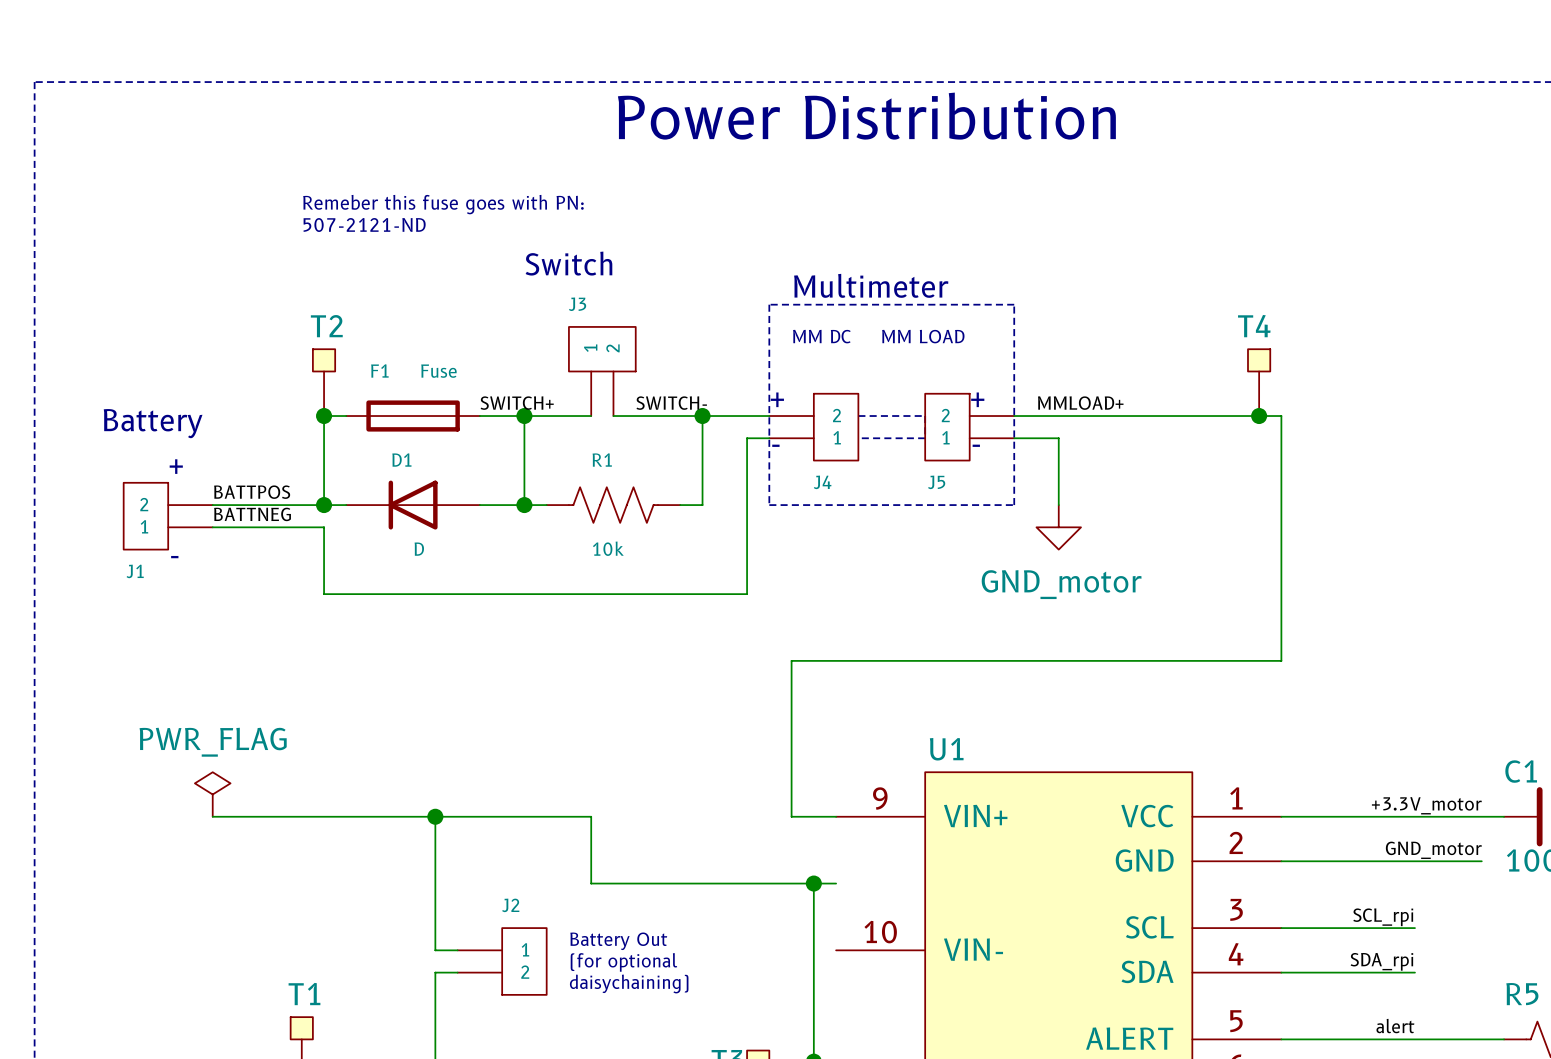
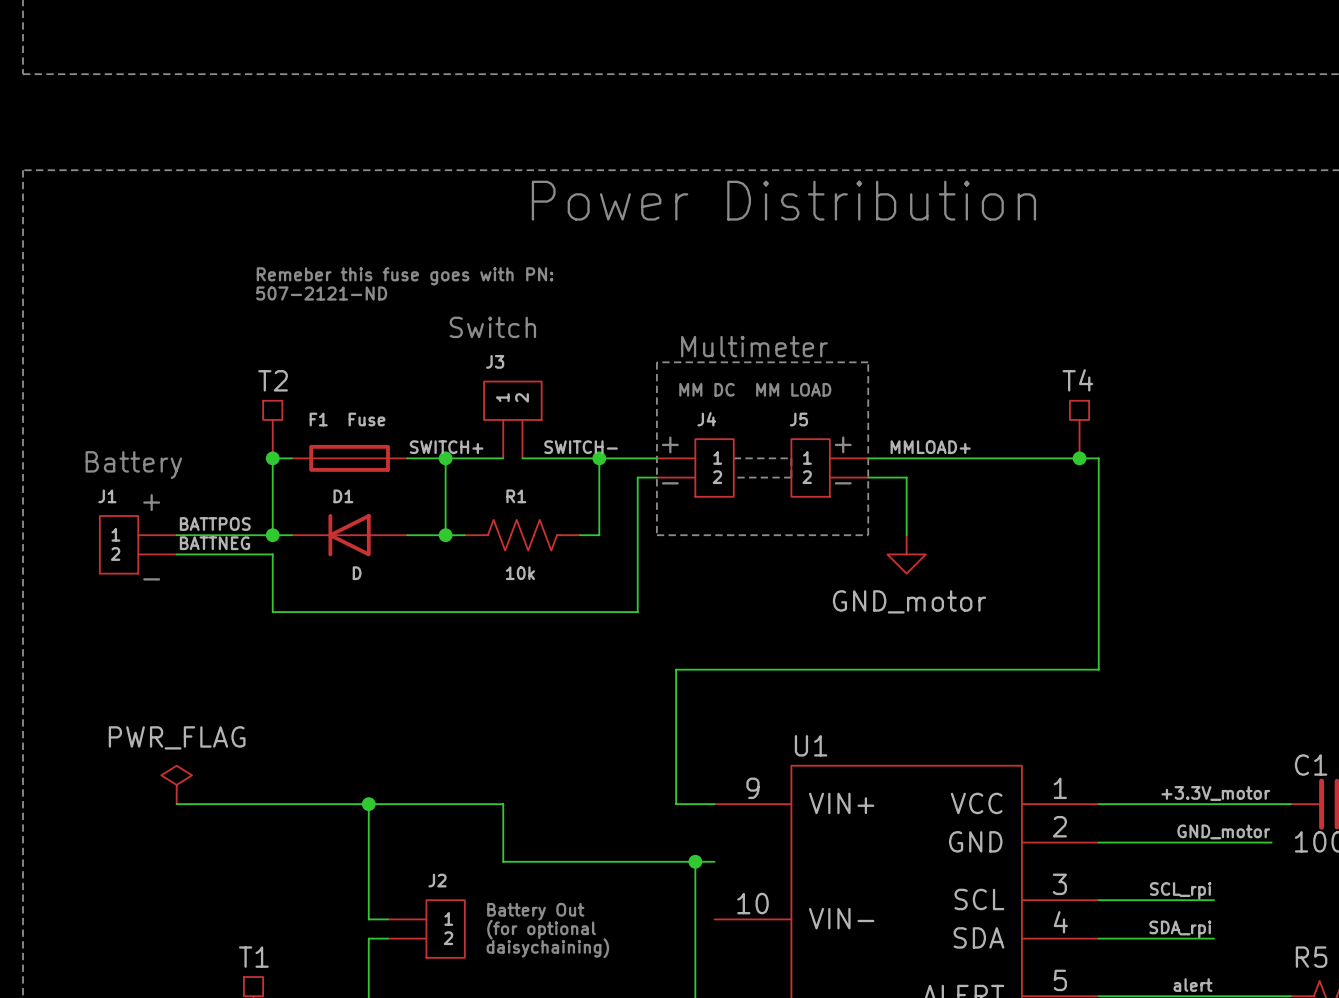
J4 flip: as is (836, 427) -> up-down (714, 467)
J5 flip: as is (947, 427) -> up-down (810, 467)
J1 flip: as is (145, 516) -> up-down (119, 544)

